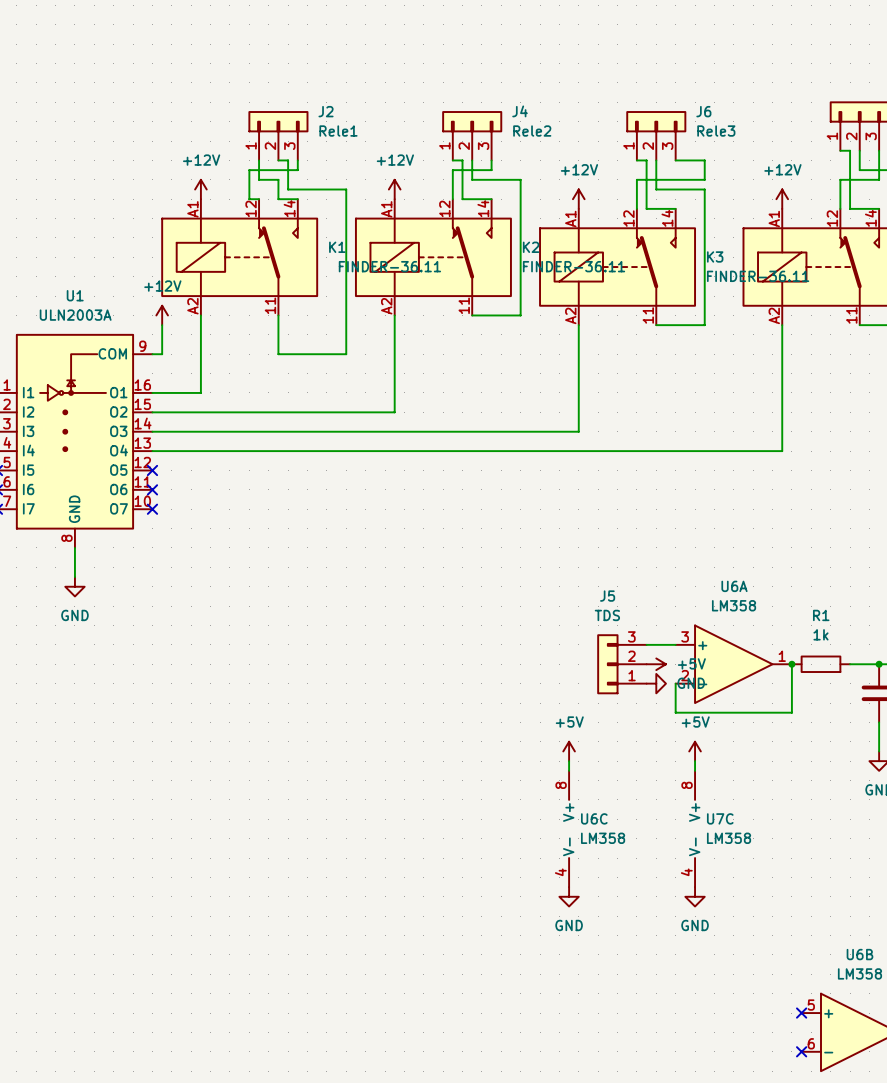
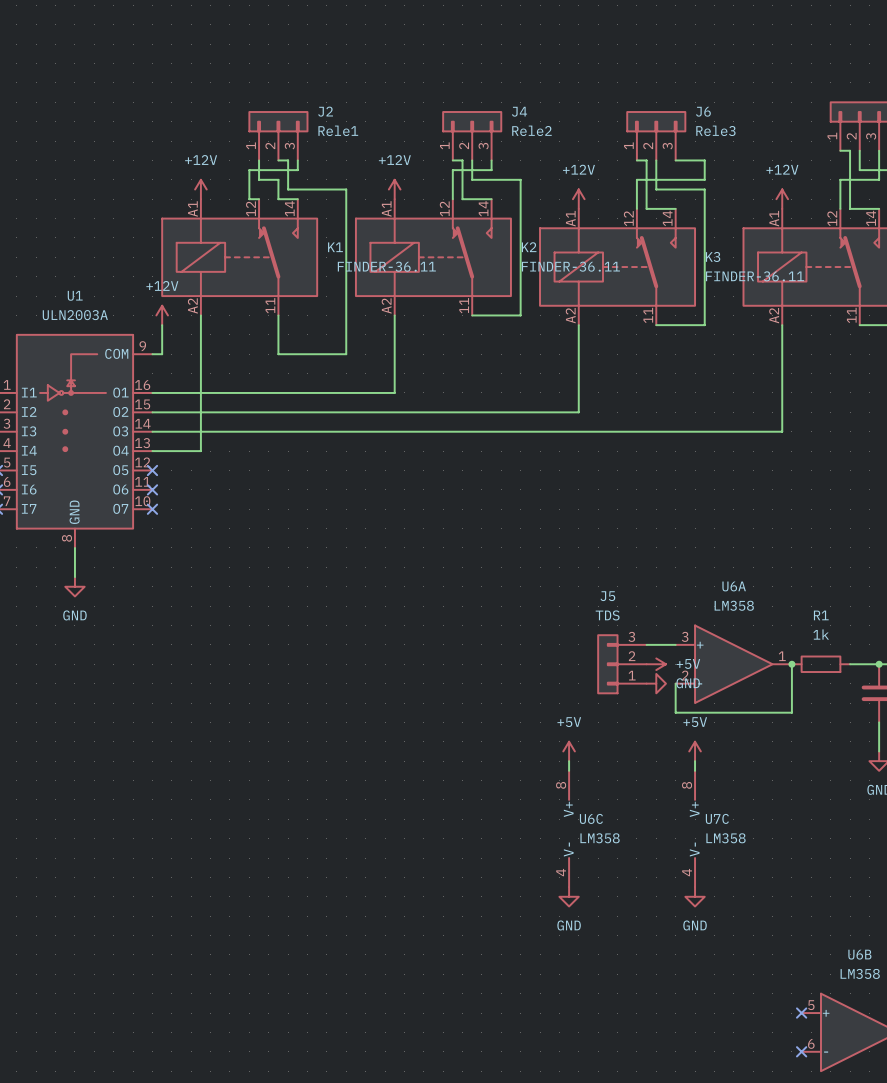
wire: (394, 392) (394, 412) -> (394, 392) (200, 392) (200, 451)
wire: (578, 412) (578, 431) -> (578, 412) (394, 412)
wire: (782, 431) (782, 451) (200, 451) -> (782, 431) (578, 431)

